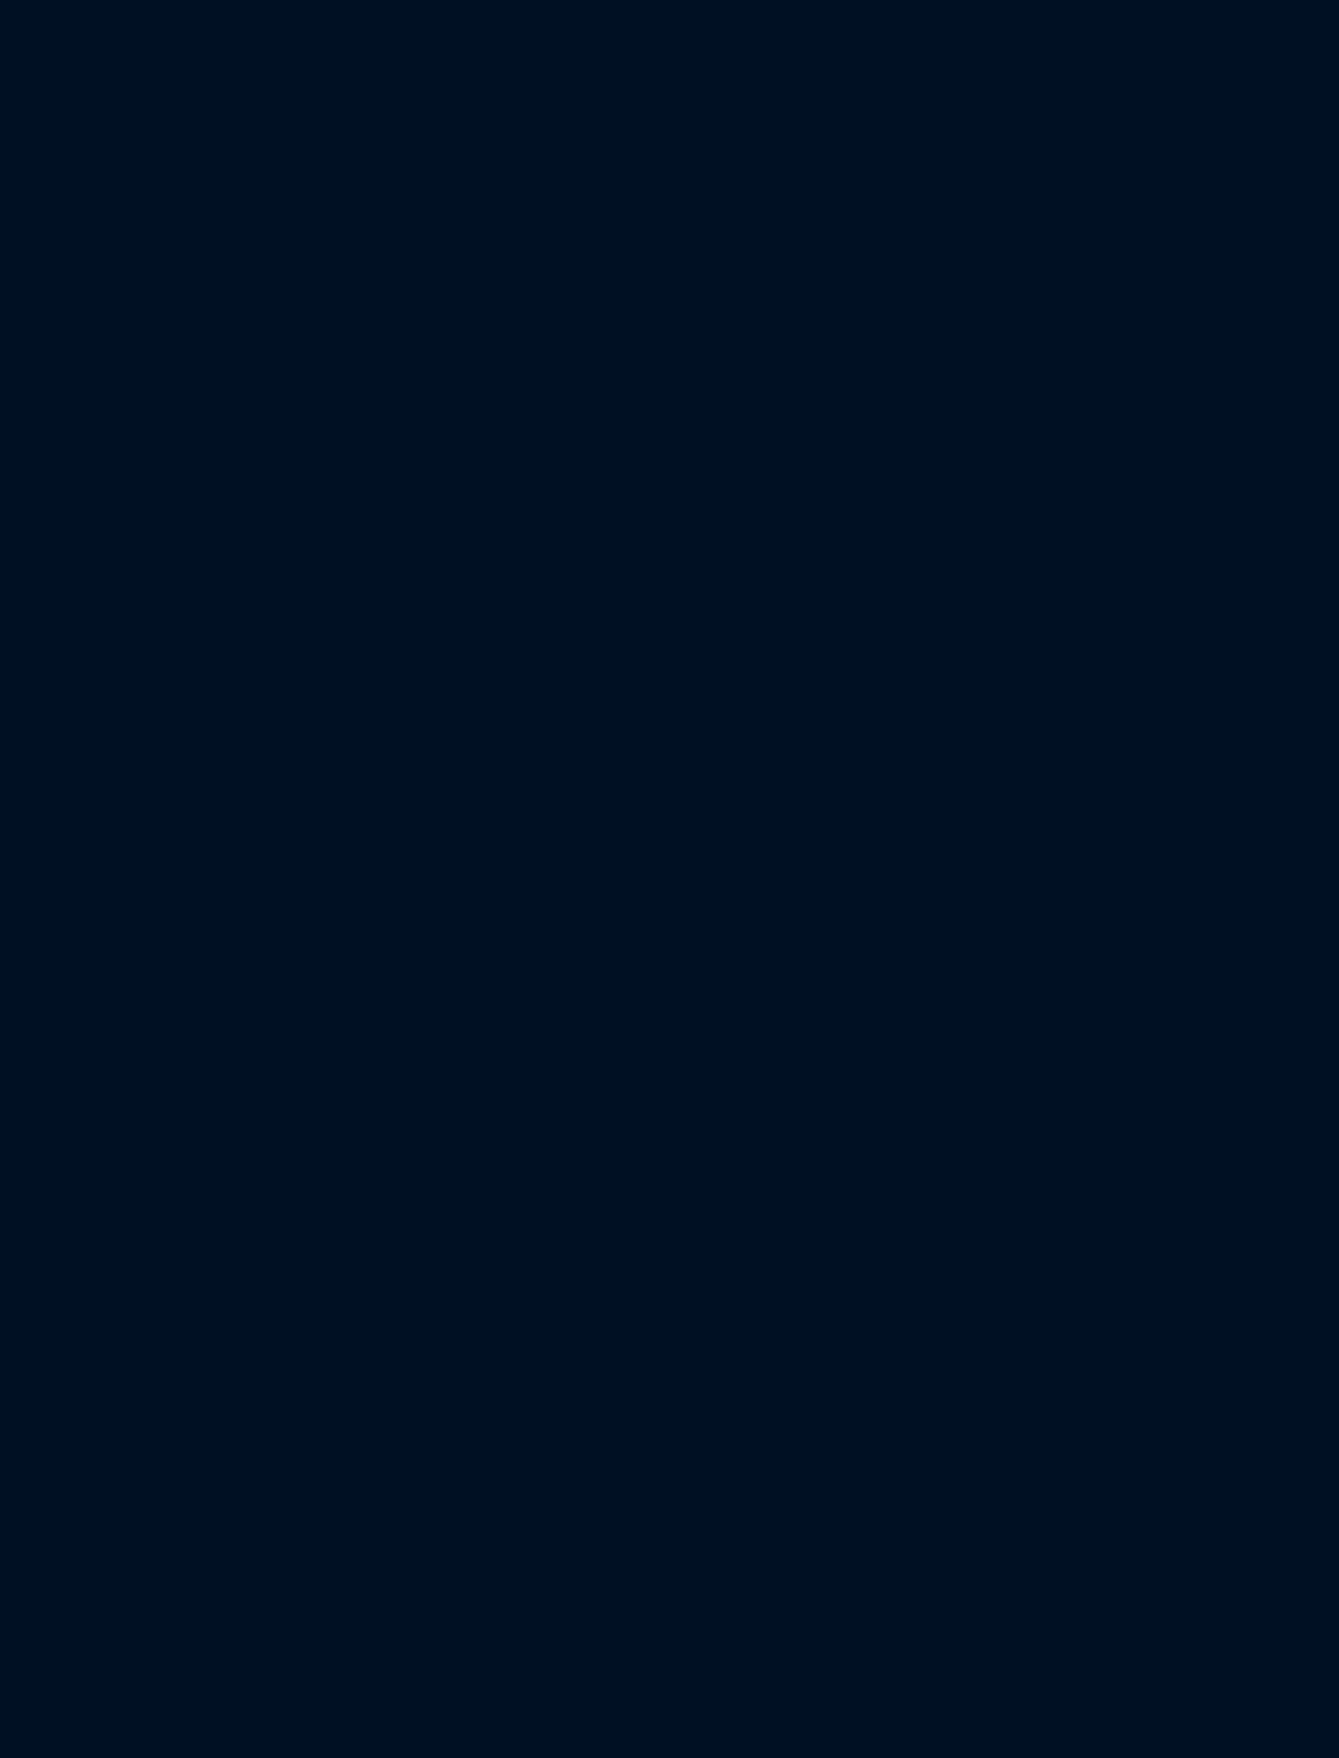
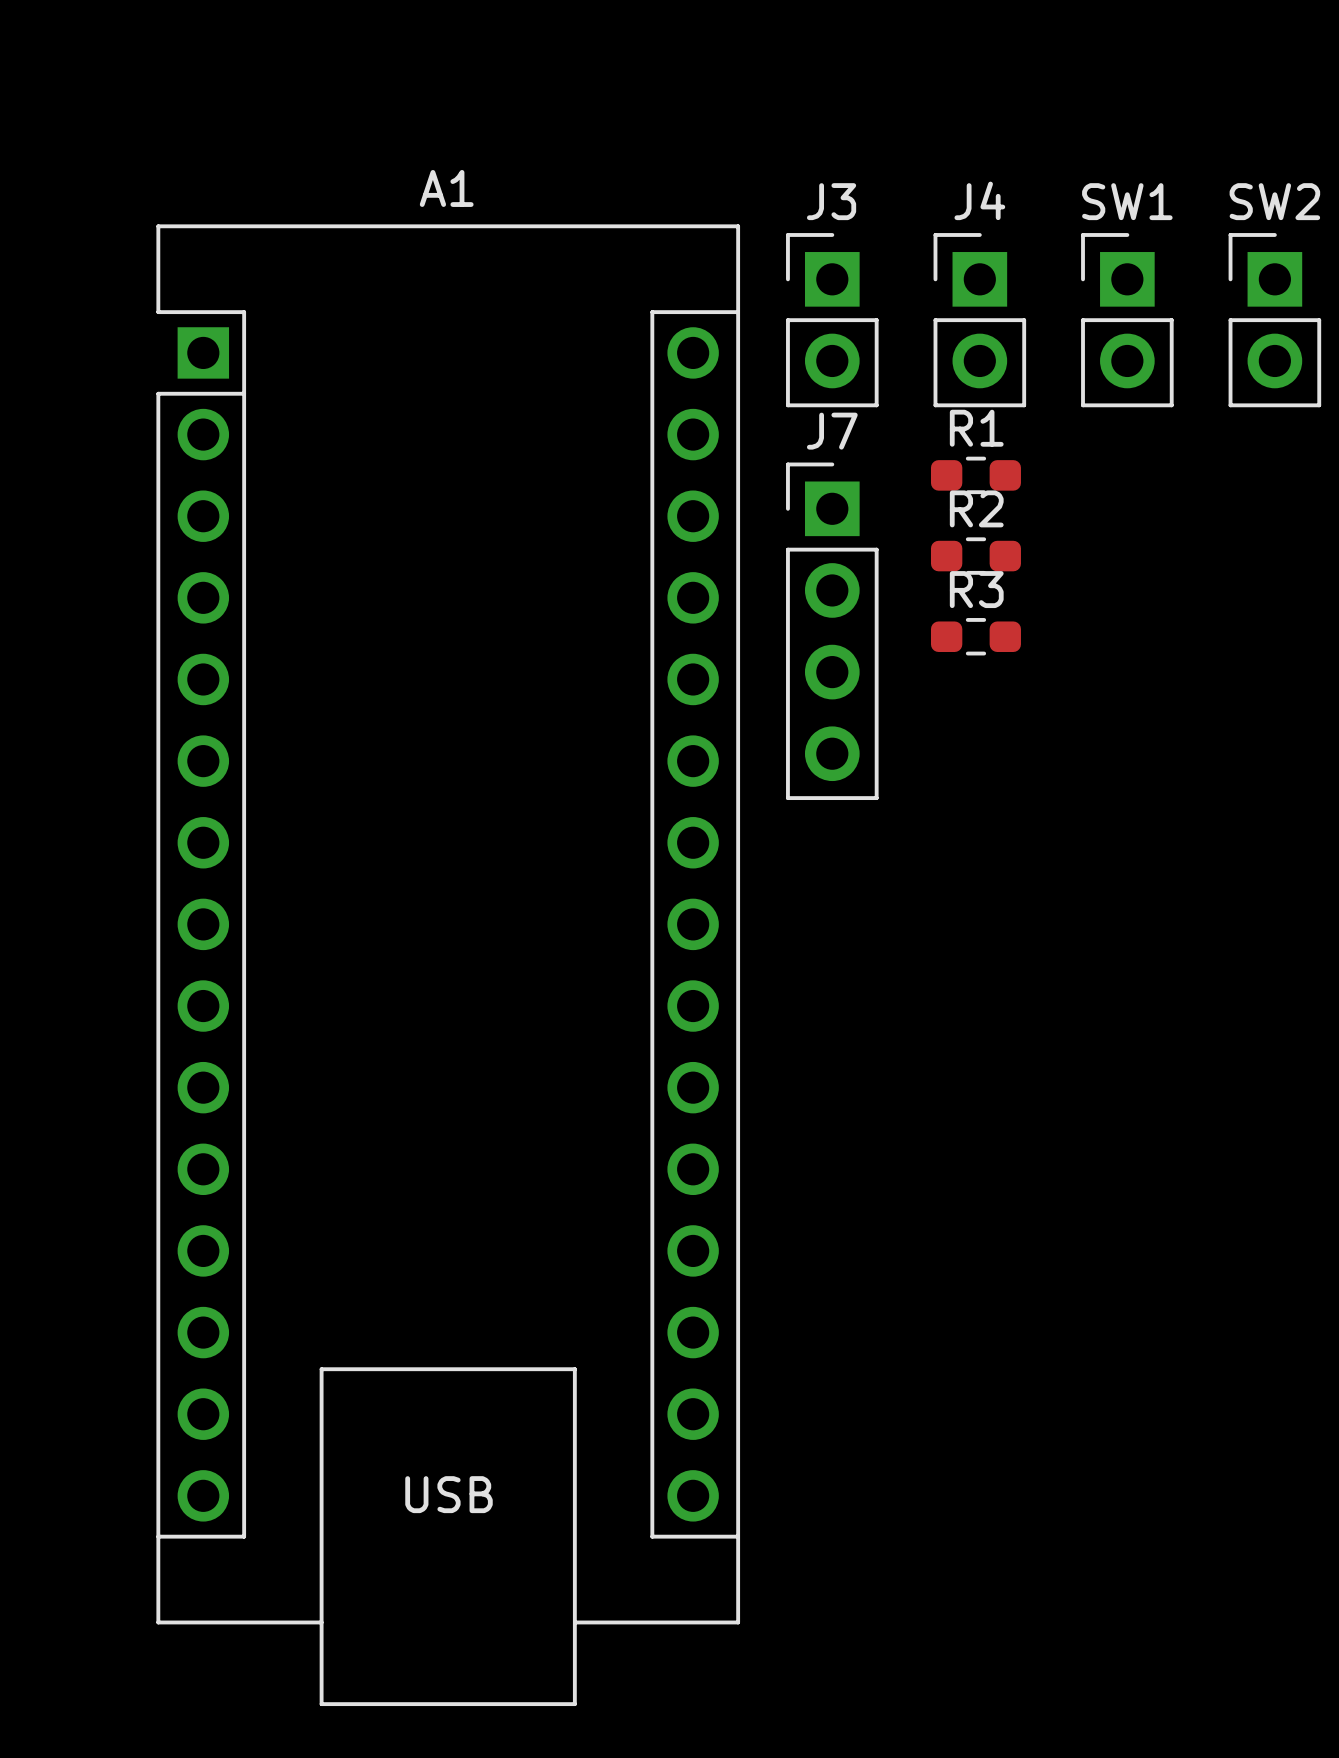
J3: none -> (832, 320)
J4: none -> (979, 320)
SW1: none -> (1127, 320)
SW2: none -> (1274, 320)
R1: none -> (975, 475)
R2: none -> (975, 556)
J7: none -> (832, 631)
R3: none -> (975, 636)
A1: none -> (448, 965)

